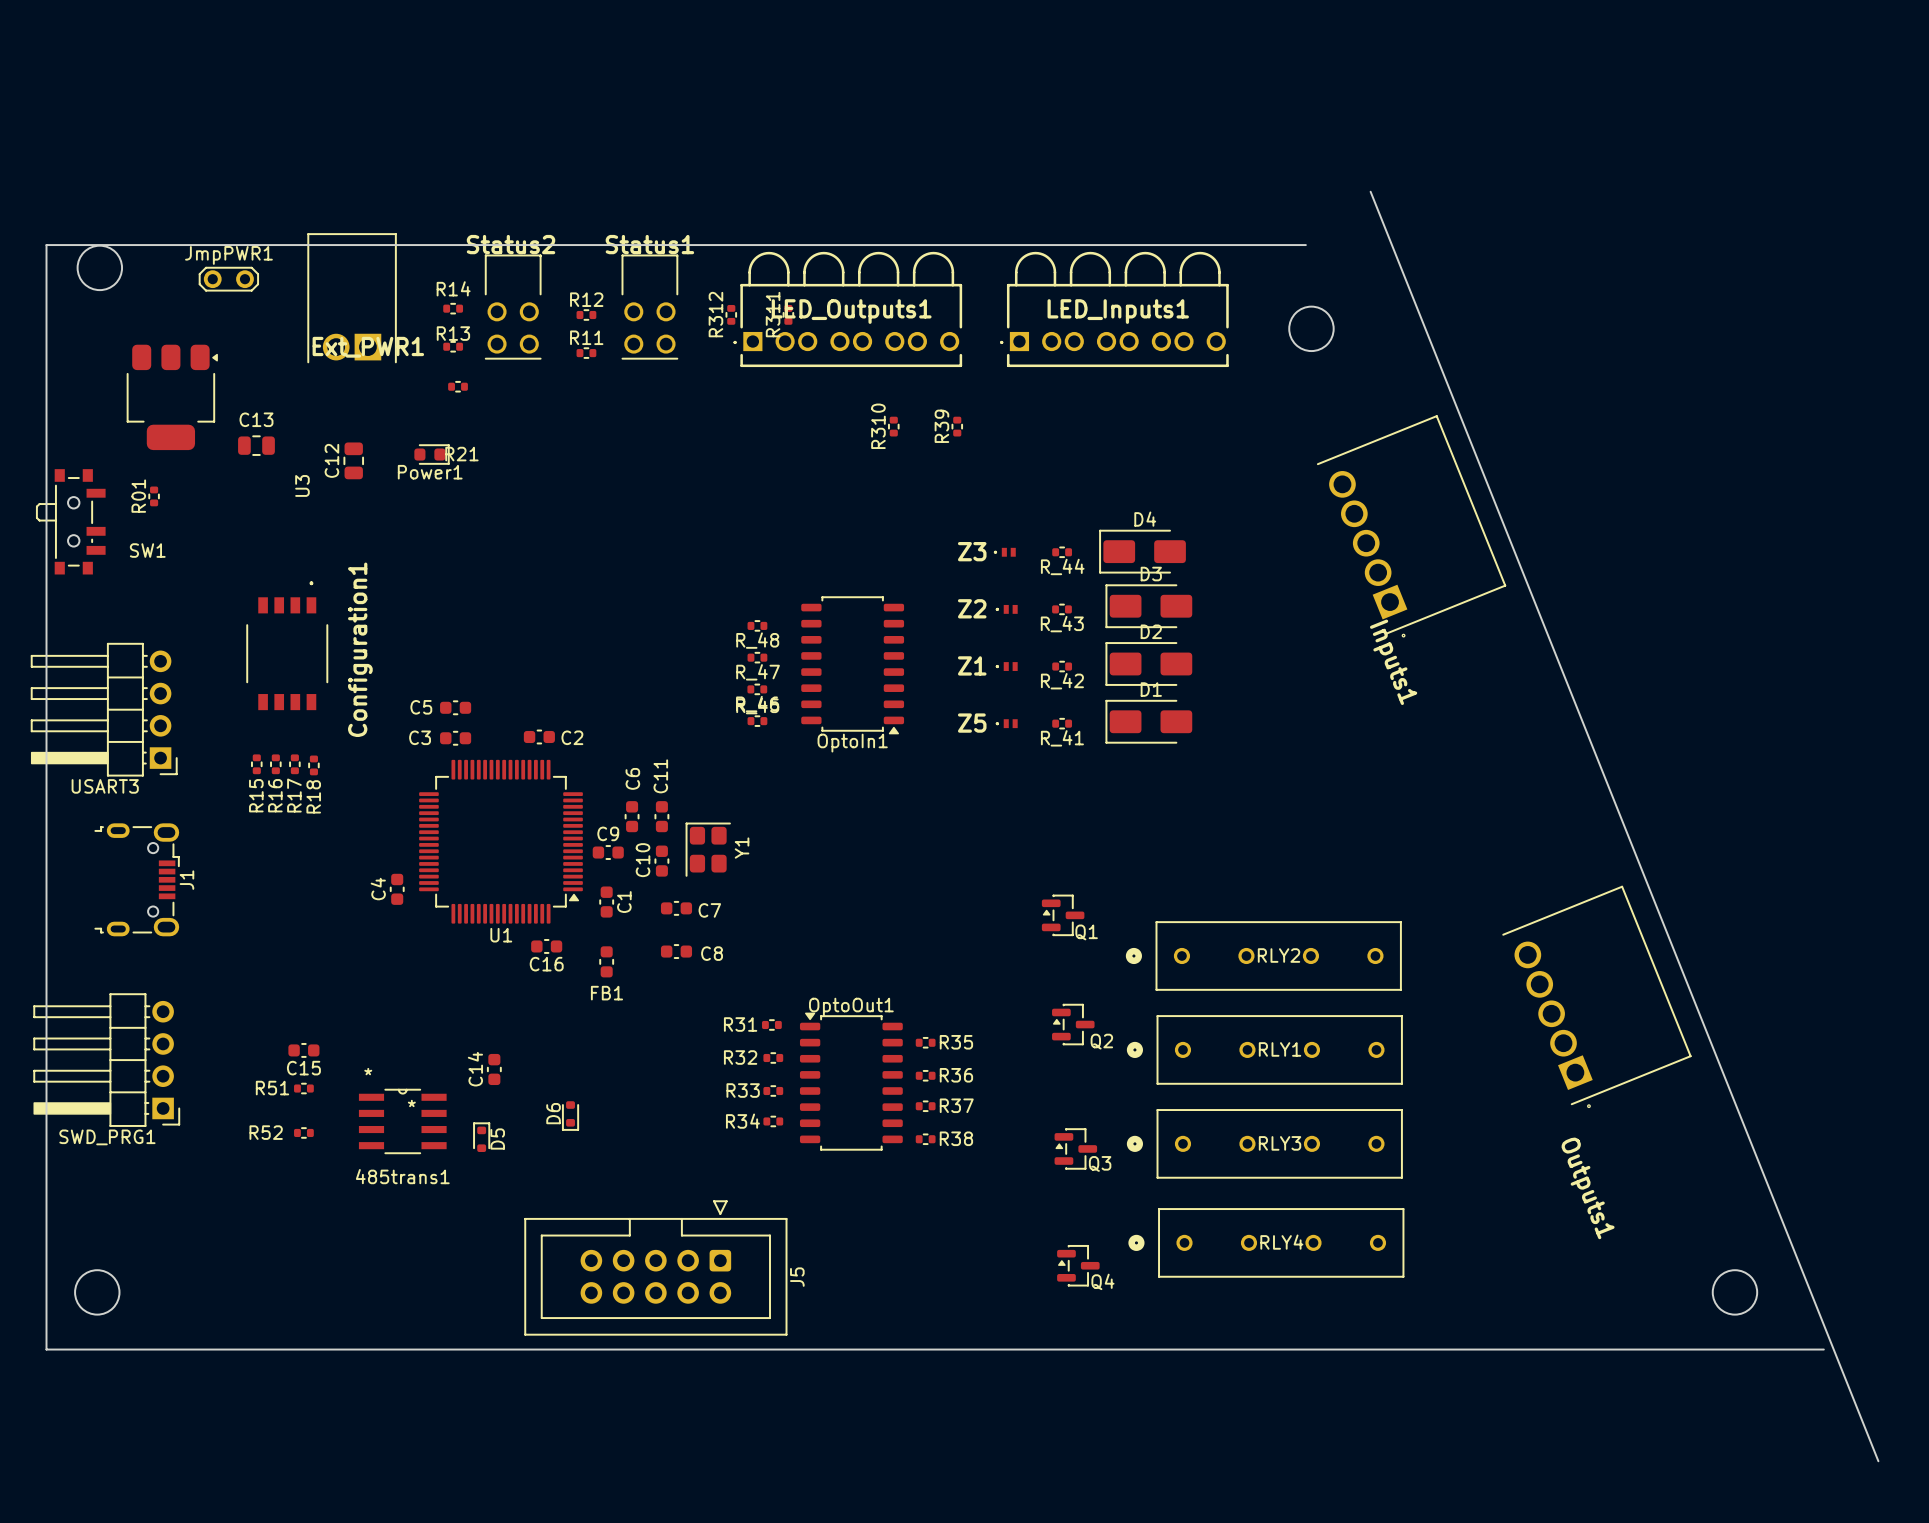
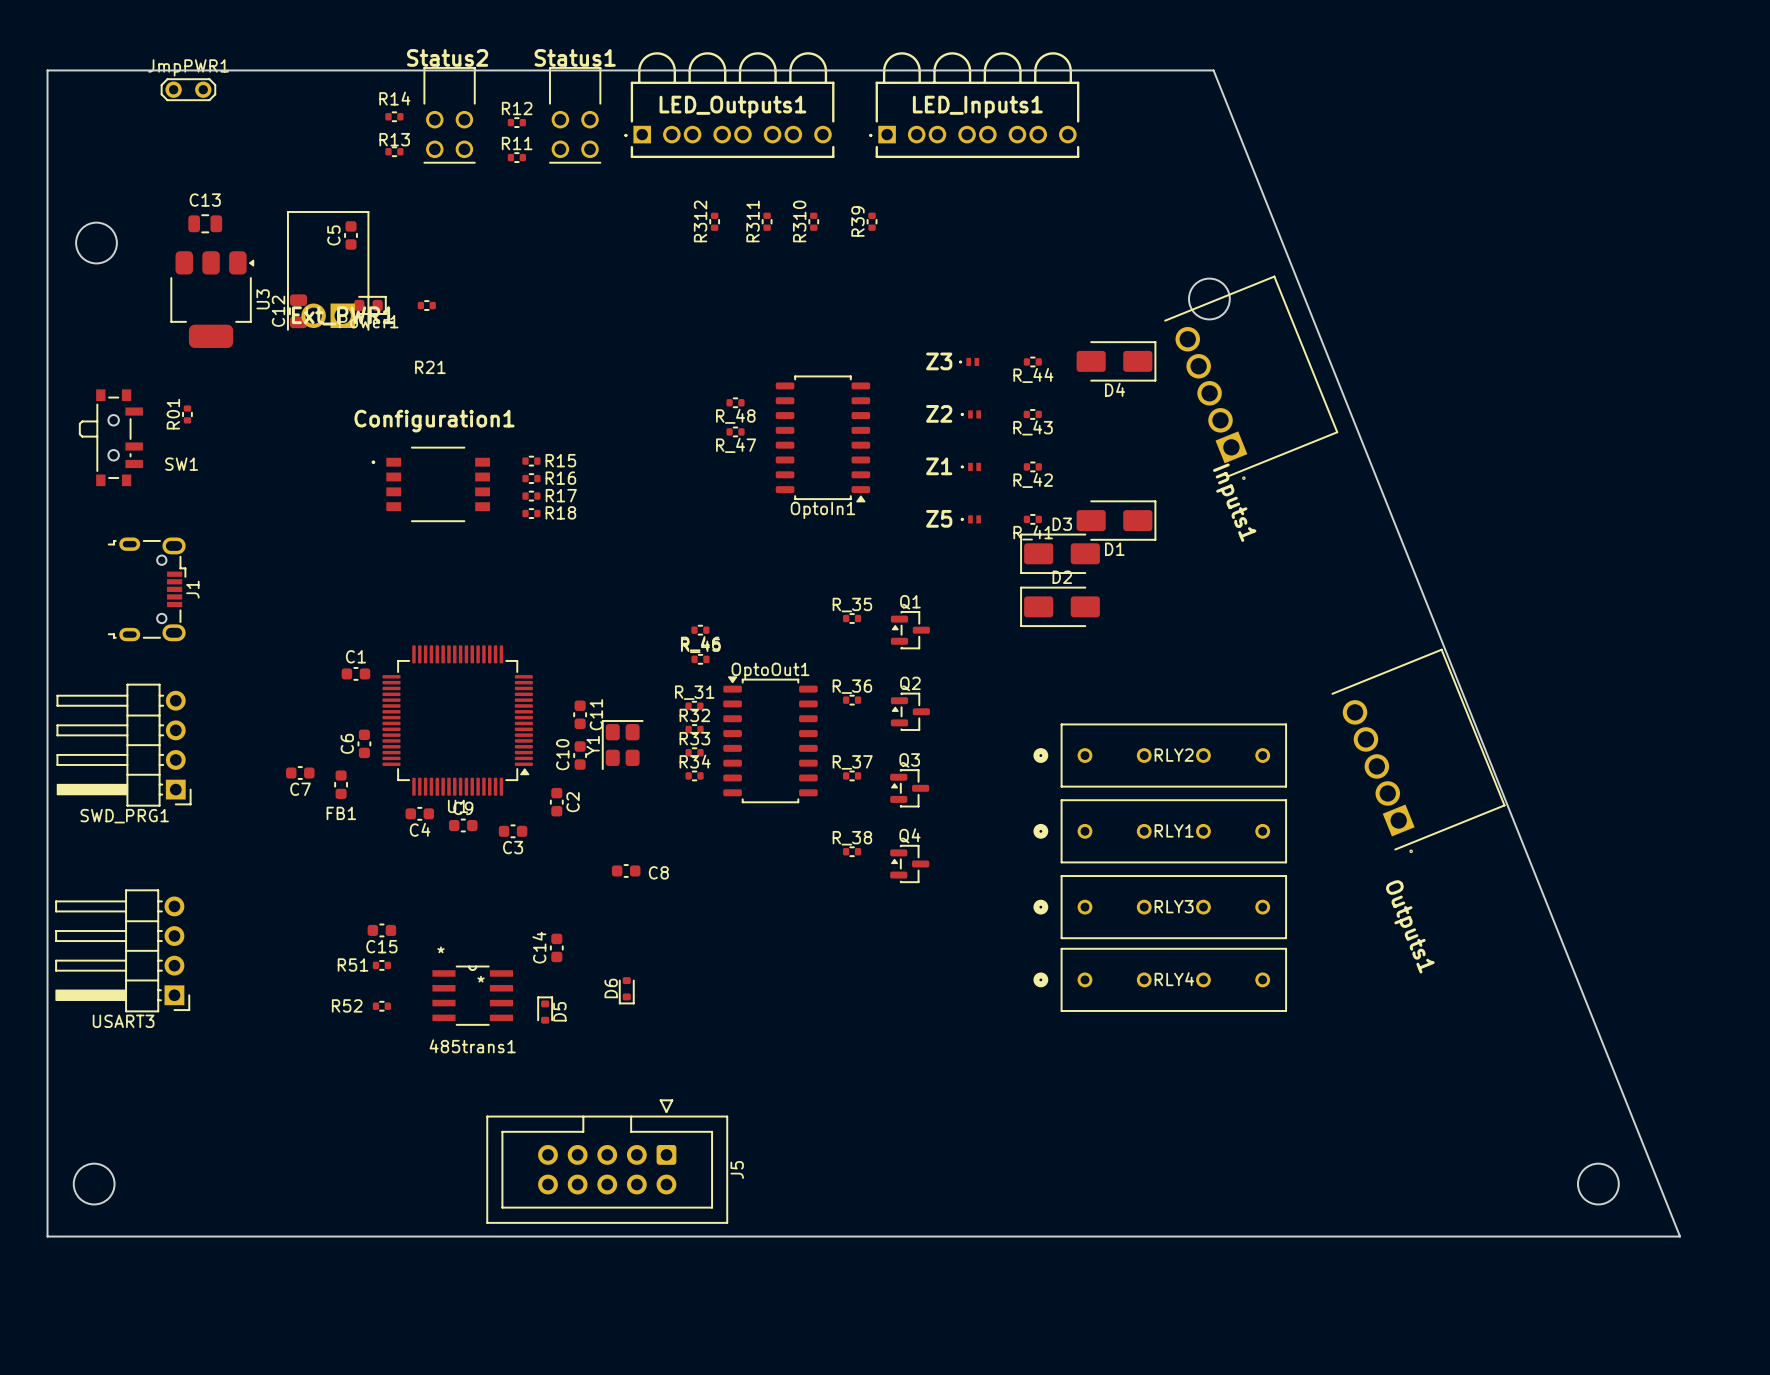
board edge: (1370, 191) (1878, 1461) -> none
board edge: (46, 245) (1305, 245) -> (47, 222) (47, 70) (1213, 70) (1680, 1236)
JmpPWR1 position: (228, 279) -> (188, 89)
Status2 position: (513, 307) -> (449, 115)
Status1 position: (649, 307) -> (575, 115)
R14 position: (453, 308) -> (394, 116)
LED_Outputs1 position: (847, 309) -> (729, 105)
LED_Inputs1 position: (1114, 309) -> (974, 105)
R312 position: (731, 314) -> (714, 221)
R311 position: (788, 314) -> (767, 221)
R12 position: (586, 315) -> (516, 122)
R13 position: (453, 346) -> (394, 151)
R11 position: (586, 353) -> (516, 157)
R21 position: (458, 386) -> (426, 305)
U3 position: (172, 397) -> (212, 299)
R310 position: (893, 426) -> (813, 221)
R39 position: (957, 426) -> (872, 221)
C13 position: (256, 445) -> (205, 223)
Power1 position: (431, 454) -> (370, 305)
C12 position: (353, 460) -> (298, 311)
U3 name position: U3 (302, 485) -> U3 (263, 299)
R01 position: (154, 496) -> (187, 414)
SW1 position: (70, 521) -> (111, 437)
Inputs1 position: (1411, 526) -> (1251, 377)
D4 rotation: 0° (1142, 551) -> 180° (1116, 361)
D4 position: (1142, 551) -> (1116, 361)
Z3 position: (1004, 552) -> (969, 361)
R_44 position: (1062, 552) -> (1032, 361)
Z2 position: (1006, 609) -> (971, 414)
R_43 position: (1061, 609) -> (1032, 414)
R_48 position: (757, 625) -> (735, 402)
Configuration1 rotation: 0° (287, 645) -> 90° counterclockwise (430, 484)
Configuration1 position: (287, 645) -> (430, 484)
R_47 position: (757, 657) -> (735, 431)
OptoIn1 position: (852, 665) -> (822, 439)
Z1 position: (1006, 666) -> (971, 466)
R_42 position: (1062, 666) -> (1032, 466)
R_35: none -> (852, 618)
C5 rotation: 0° (455, 707) -> 90° clockwise (350, 235)
C5 position: (455, 707) -> (350, 235)
USART3 position: (104, 709) -> (122, 950)
D1 rotation: 0° (1148, 721) -> 180° (1116, 520)
D1 position: (1148, 721) -> (1116, 520)
Z5 position: (1006, 723) -> (971, 519)
R_41 position: (1062, 723) -> (1032, 519)
C2 rotation: 0° (539, 736) -> 90° clockwise (556, 802)
C2 position: (539, 736) -> (556, 802)
C3 name position: C3 (420, 737) -> C3 (513, 847)
C3 position: (455, 738) -> (513, 831)
R15 rotation: 0° (256, 764) -> 90° clockwise (531, 461)
R15 position: (256, 764) -> (531, 461)
R16 rotation: 0° (275, 764) -> 90° clockwise (531, 478)
R16 position: (275, 764) -> (531, 478)
R17 rotation: 0° (294, 764) -> 90° clockwise (531, 496)
R17 position: (294, 764) -> (531, 496)
R18 rotation: 0° (313, 765) -> 90° clockwise (531, 513)
R18 position: (313, 765) -> (531, 513)
R_36: none -> (852, 700)
R_31: none -> (694, 706)
C11 name position: C11 (660, 776) -> C11 (596, 714)
C6 name position: C6 (632, 778) -> C6 (347, 743)
R15 name position: R15 (256, 795) -> R15 (560, 460)
R16 name position: R16 (275, 795) -> R16 (560, 478)
R17 name position: R17 (294, 795) -> R17 (561, 495)
R18 name position: R18 (313, 796) -> R18 (560, 512)
C6 position: (632, 816) -> (364, 743)
C11 position: (661, 816) -> (580, 714)
U1 position: (500, 841) -> (457, 720)
Y1 name position: Y1 (742, 848) -> Y1 (593, 745)
R_37: none -> (852, 775)
Y1 position: (708, 849) -> (622, 745)
C9 position: (608, 852) -> (463, 825)
C10 position: (661, 861) -> (580, 755)
J1 position: (137, 879) -> (147, 589)
C4 name position: C4 (378, 889) -> C4 (420, 829)
C4 rotation: 0° (397, 889) -> 90° clockwise (419, 813)
C4 position: (397, 889) -> (419, 813)
C1 rotation: 0° (606, 902) -> 90° clockwise (355, 673)
C1 position: (606, 902) -> (355, 673)
C1 name position: C1 (624, 902) -> C1 (355, 656)
C7 position: (676, 908) -> (300, 773)
C7 name position: C7 (709, 910) -> C7 (300, 789)
Q1 position: (1063, 915) -> (910, 630)
R_38: none -> (852, 851)
Q1 name position: Q1 (1086, 932) -> Q1 (910, 602)
C16: (546, 946) -> none
RLY2 position: (1263, 955) -> (1160, 755)
FB1 position: (606, 961) -> (341, 784)
Outputs1 position: (1596, 997) -> (1418, 751)
R31: (771, 1024) -> none
Q2 position: (1073, 1024) -> (910, 711)
Q2 name position: Q2 (1101, 1041) -> Q2 (910, 683)
R35: (925, 1042) -> none
RLY1 position: (1264, 1049) -> (1160, 831)
C15 position: (303, 1050) -> (381, 930)
R32 name position: R32 (740, 1057) -> R32 (694, 715)
R32 position: (773, 1057) -> (694, 729)
SWD_PRG1 position: (106, 1060) -> (124, 745)
C14 position: (494, 1069) -> (556, 947)
R36: (925, 1075) -> none
OptoOut1 position: (851, 1081) -> (770, 739)
R51 position: (303, 1088) -> (381, 965)
R33 name position: R33 (743, 1090) -> R33 (694, 738)
R33 position: (773, 1091) -> (694, 752)
R37: (925, 1106) -> none
D6 position: (570, 1115) -> (626, 990)
485trans1 position: (402, 1121) -> (472, 995)
R34 name position: R34 (742, 1121) -> R34 (695, 761)
R34 position: (773, 1121) -> (694, 775)
R52 position: (303, 1132) -> (381, 1006)
D5 position: (481, 1137) -> (545, 1010)
R38: (925, 1139) -> none
RLY3 position: (1264, 1143) -> (1160, 907)
Q3 position: (1075, 1148) -> (909, 788)
Q3 name position: Q3 (1100, 1163) -> Q3 (909, 760)
RLY4 position: (1266, 1242) -> (1160, 979)
Q4 position: (1078, 1265) -> (909, 863)
Q4 name position: Q4 (1102, 1281) -> Q4 (909, 835)

